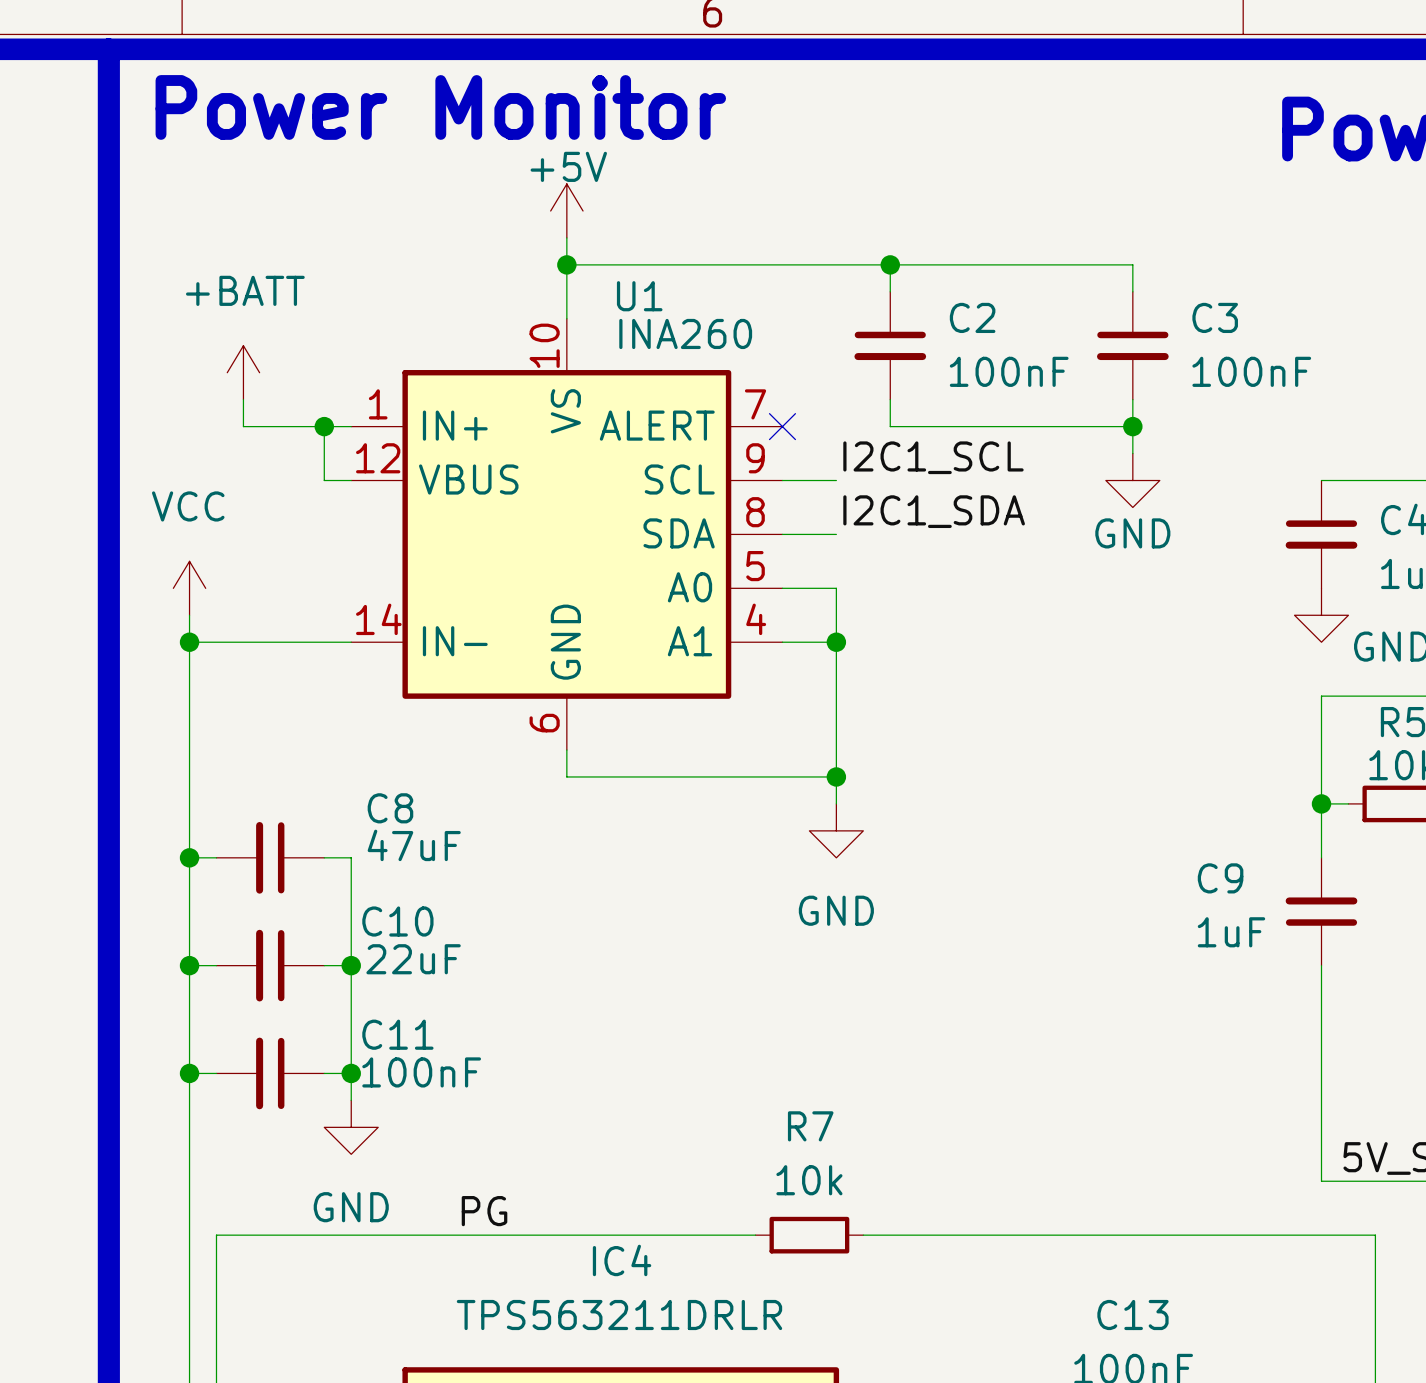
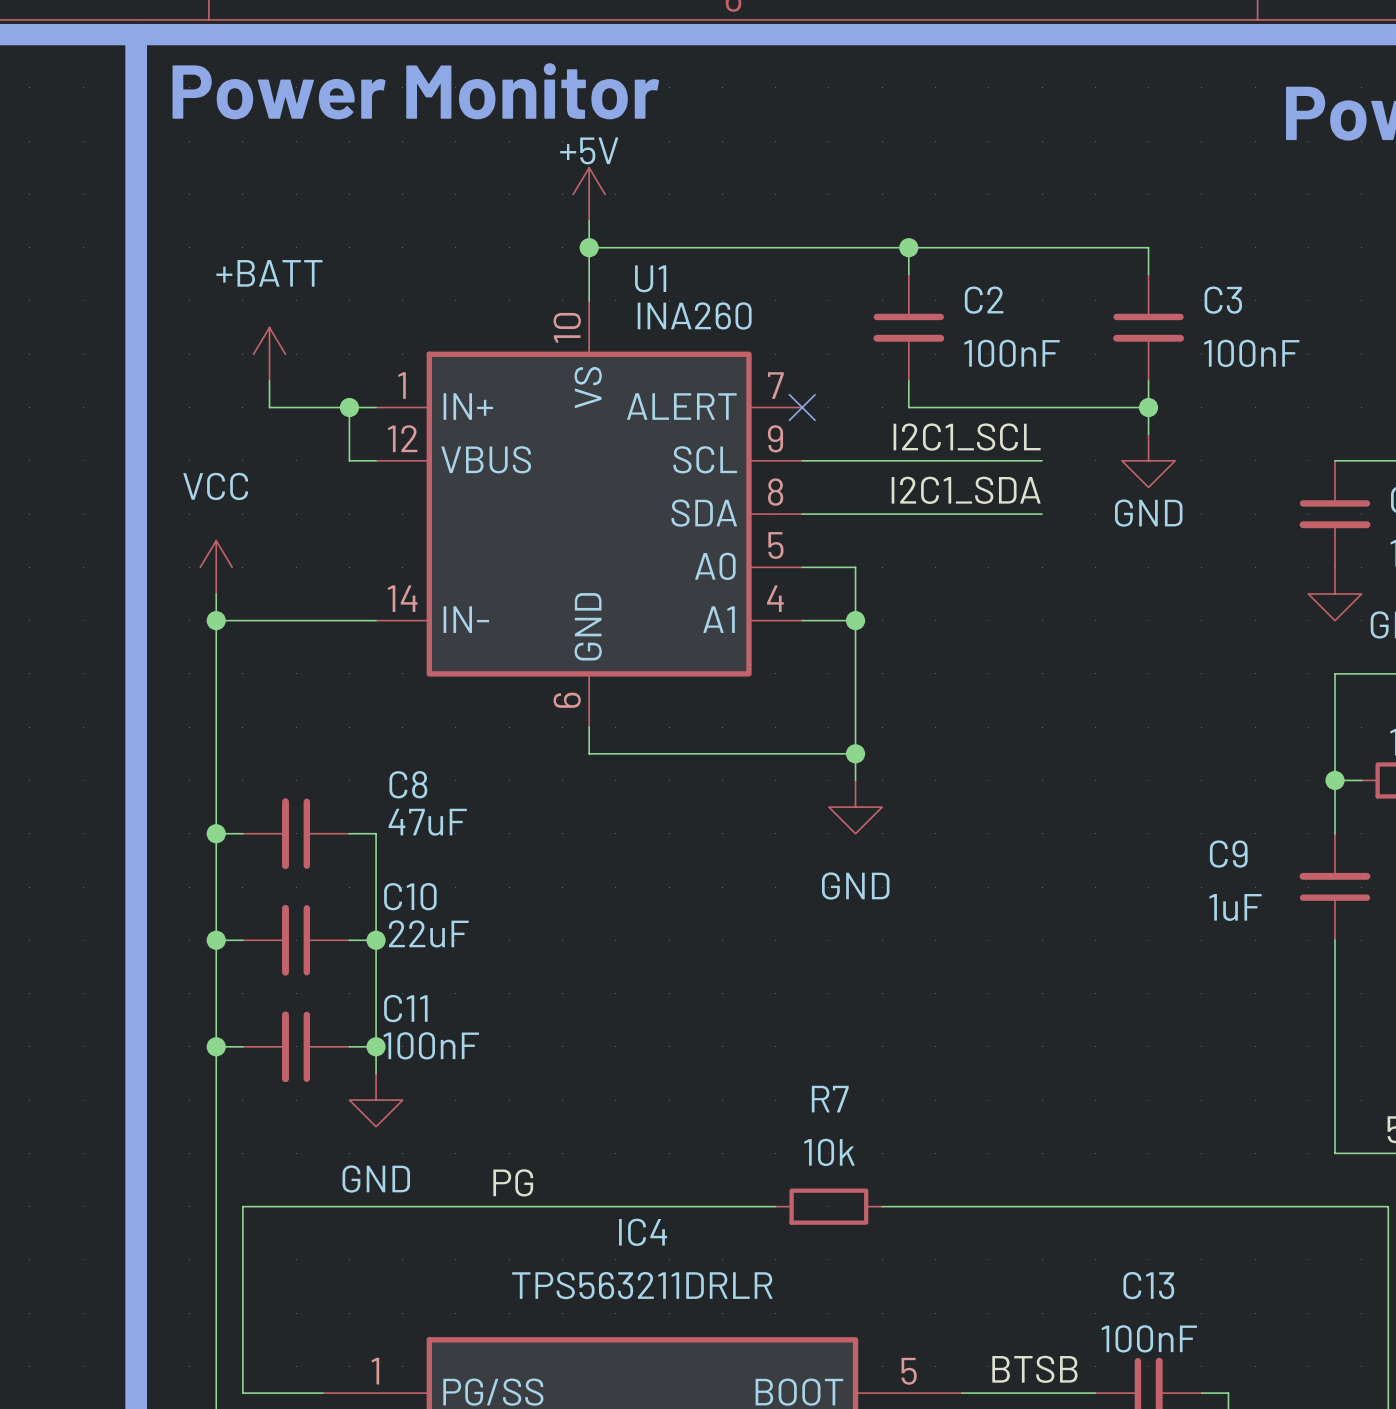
label position: I2C1_SCL (933, 457) -> I2C1_SCL (967, 437)
wire: none -> (855, 460) (1042, 460)
label position: I2C1_SDA (934, 511) -> I2C1_SDA (966, 490)
wire: none -> (855, 514) (1042, 514)

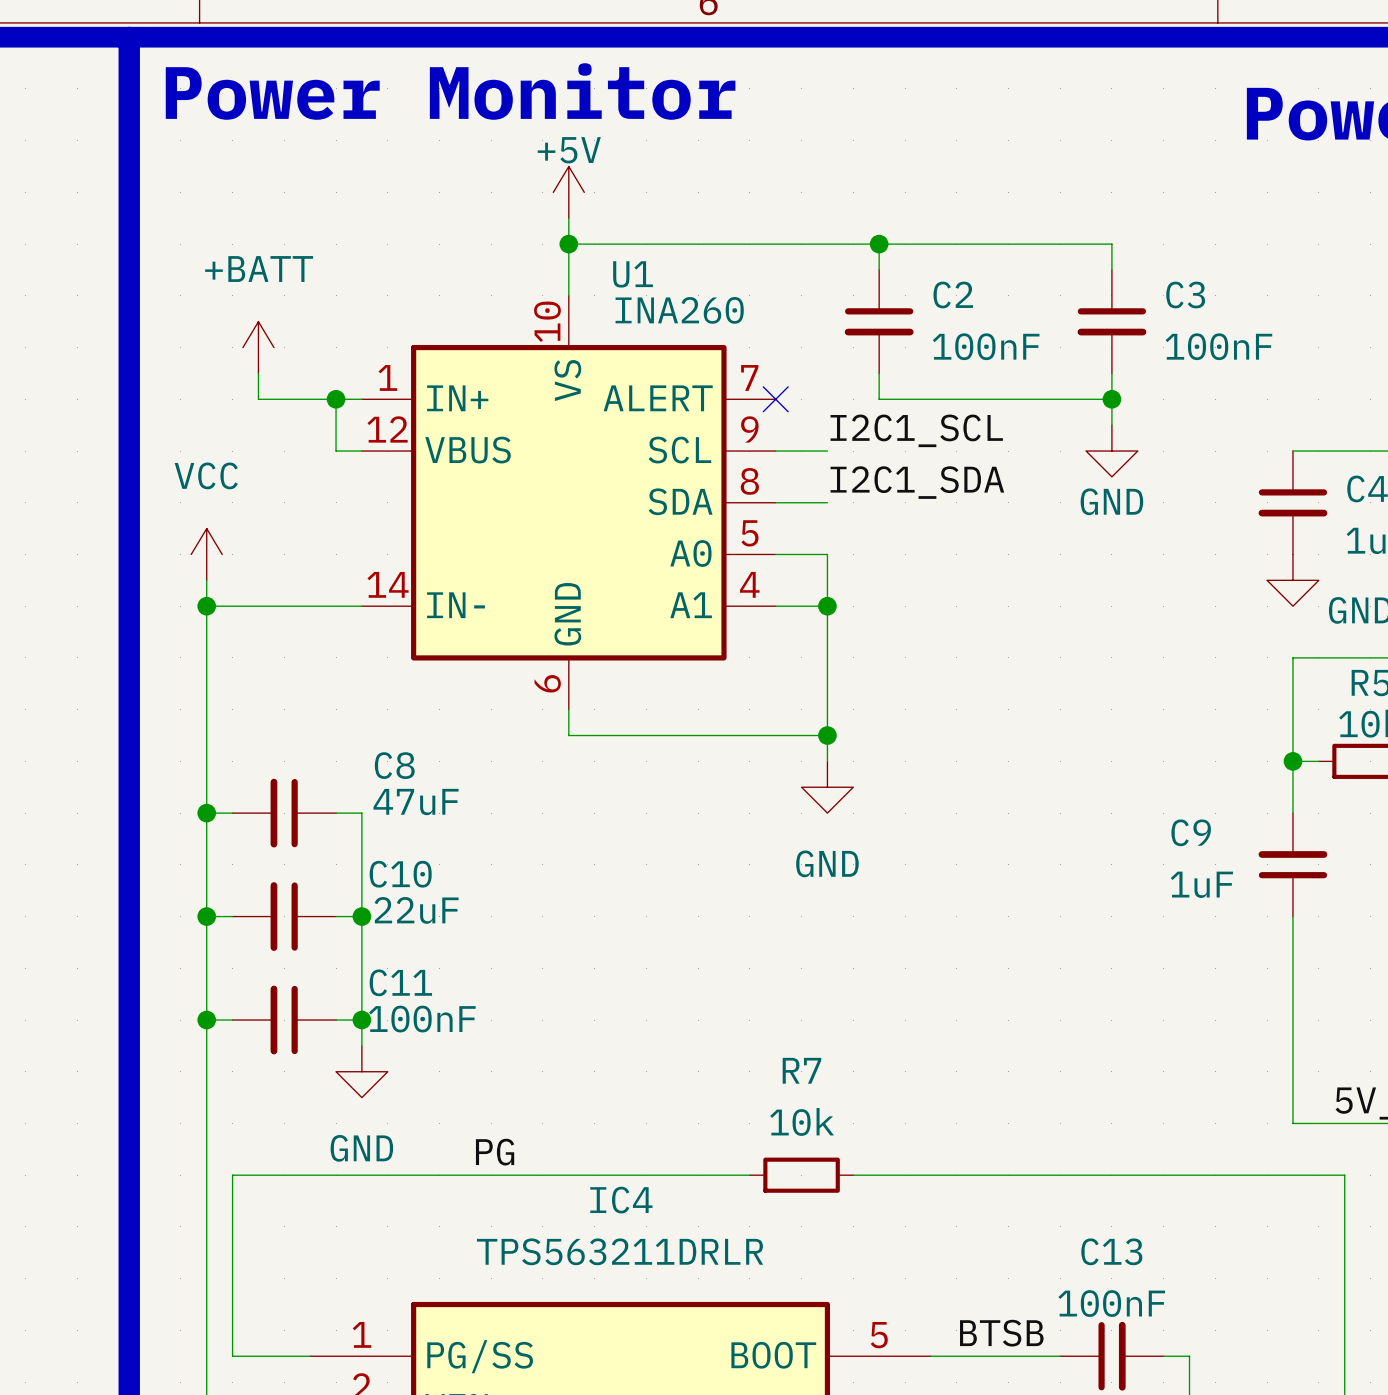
label position: I2C1_SCL (967, 437) -> I2C1_SCL (916, 430)
wire: (855, 460) (1042, 460) -> none
label position: I2C1_SDA (966, 490) -> I2C1_SDA (917, 482)
wire: (855, 514) (1042, 514) -> none

